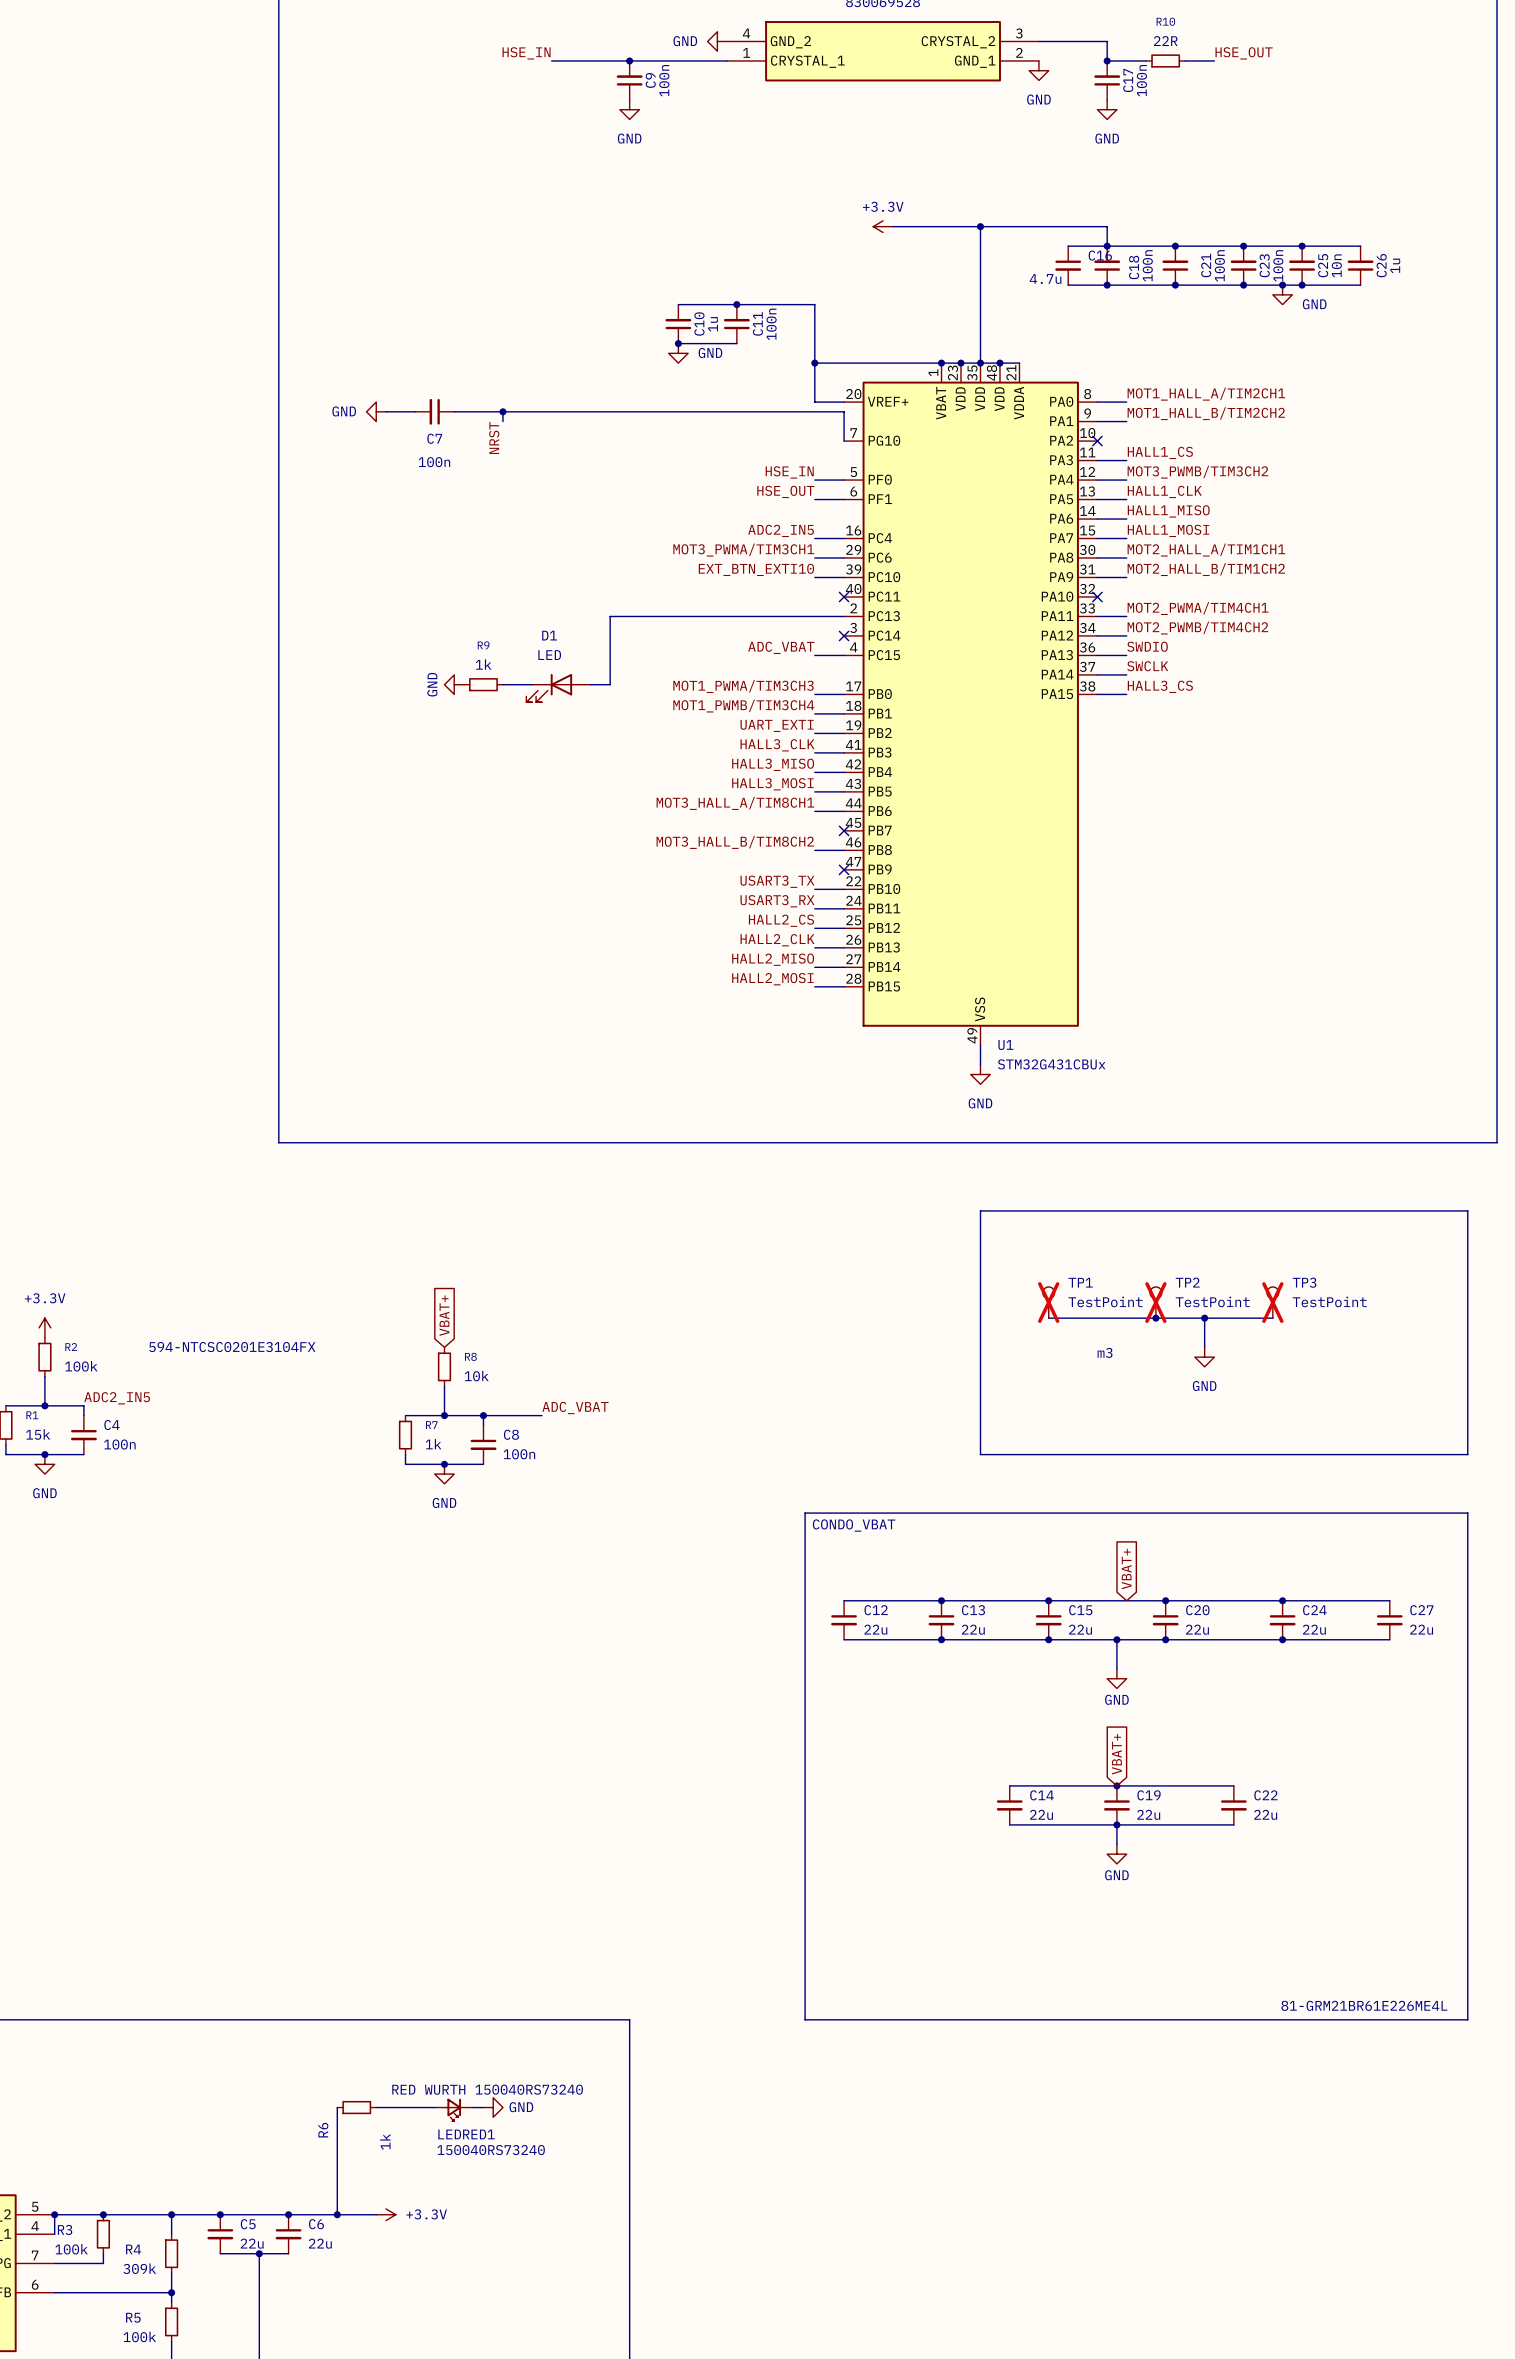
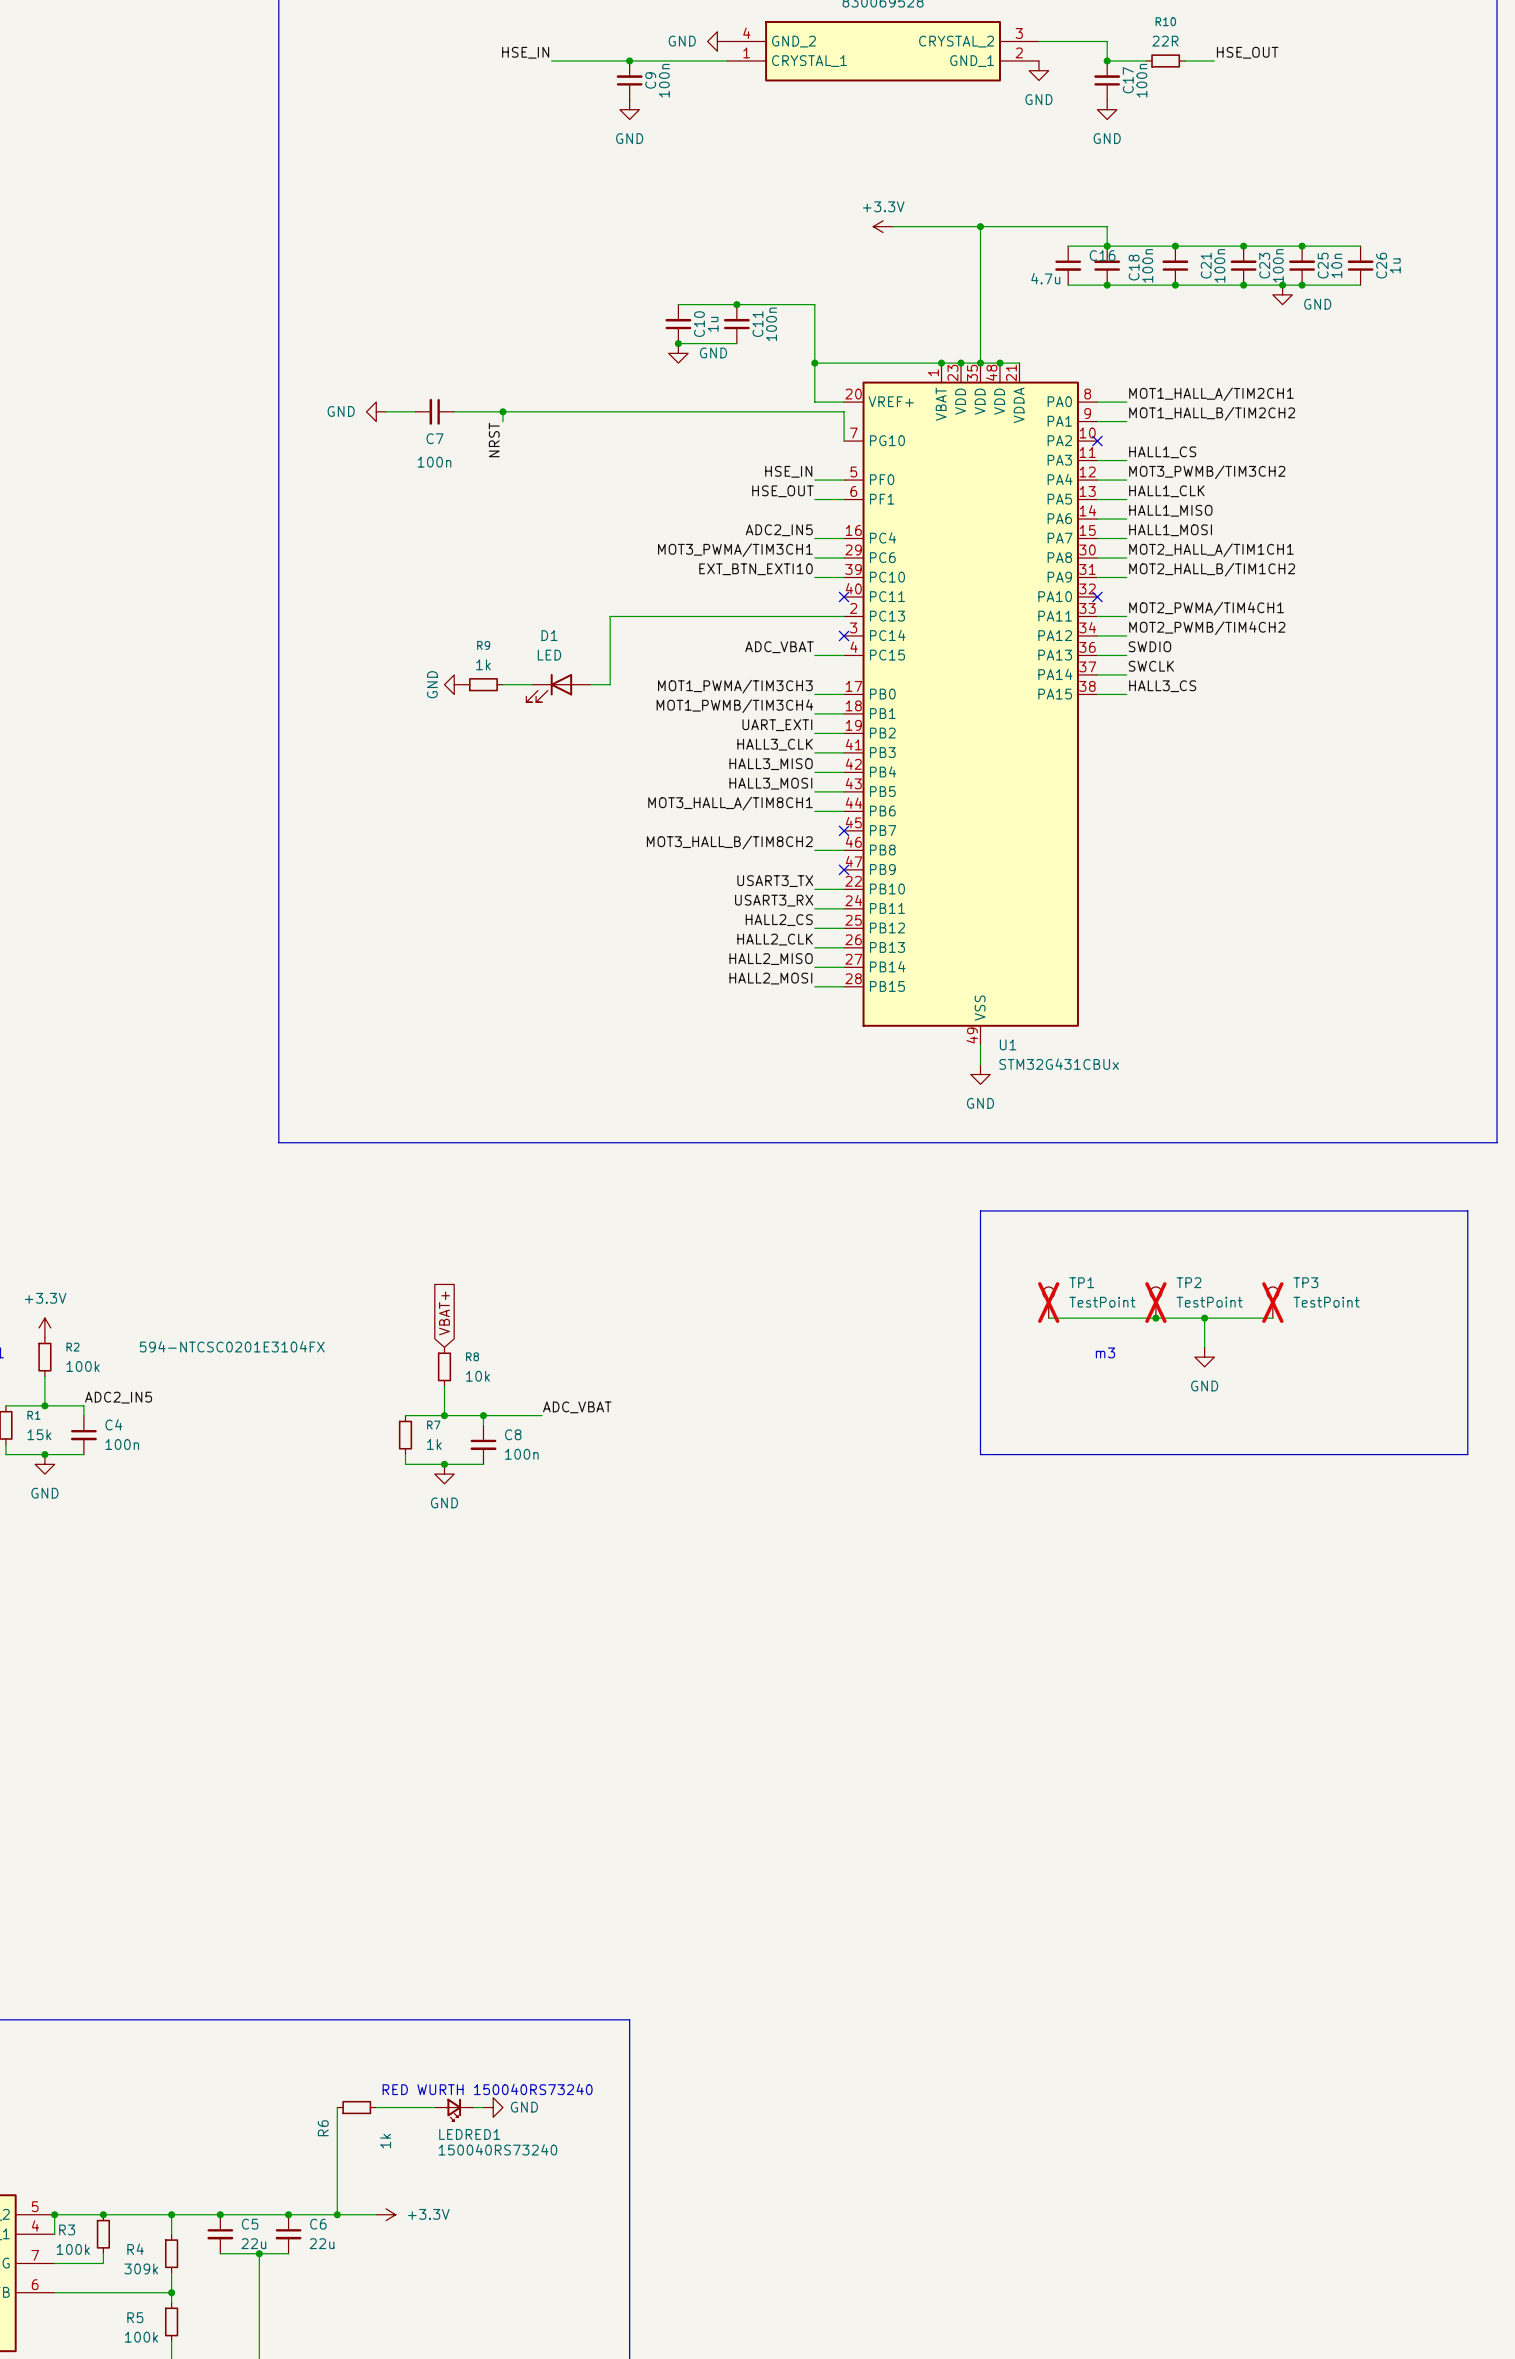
line: (805, 1513) (1467, 1513) (1467, 2019) (805, 2019) (805, 1513) -> none
text: CONDO_VBAT (854, 1525) -> none
global label: VBAT+ (1126, 1569) -> none
wire: (844, 1600) (1389, 1600) -> none
junction: (941, 1600) -> none
junction: (1048, 1600) -> none
junction: (1165, 1600) -> none
junction: (1282, 1600) -> none
C12: 22u (844, 1620) -> none
C13: 22u (941, 1620) -> none
C15: 22u (1048, 1620) -> none
C20: 22u (1165, 1620) -> none
C24: 22u (1282, 1620) -> none
C27: 22u (1389, 1620) -> none
wire: (844, 1639) (1389, 1639) -> none
junction: (941, 1639) -> none
junction: (1048, 1639) -> none
wire: (1116, 1639) (1116, 1668) -> none
junction: (1116, 1639) -> none
junction: (1165, 1639) -> none
junction: (1282, 1639) -> none
power symbol: GND (1116, 1678) -> none
global label: VBAT+ (1116, 1754) -> none
wire: (1009, 1785) (1233, 1785) -> none
junction: (1116, 1785) -> none
C14: 22u (1009, 1805) -> none
C19: 22u (1116, 1805) -> none
C22: 22u (1233, 1805) -> none
wire: (1009, 1824) (1233, 1824) -> none
wire: (1116, 1824) (1116, 1844) -> none
junction: (1116, 1824) -> none
power symbol: GND (1116, 1854) -> none

